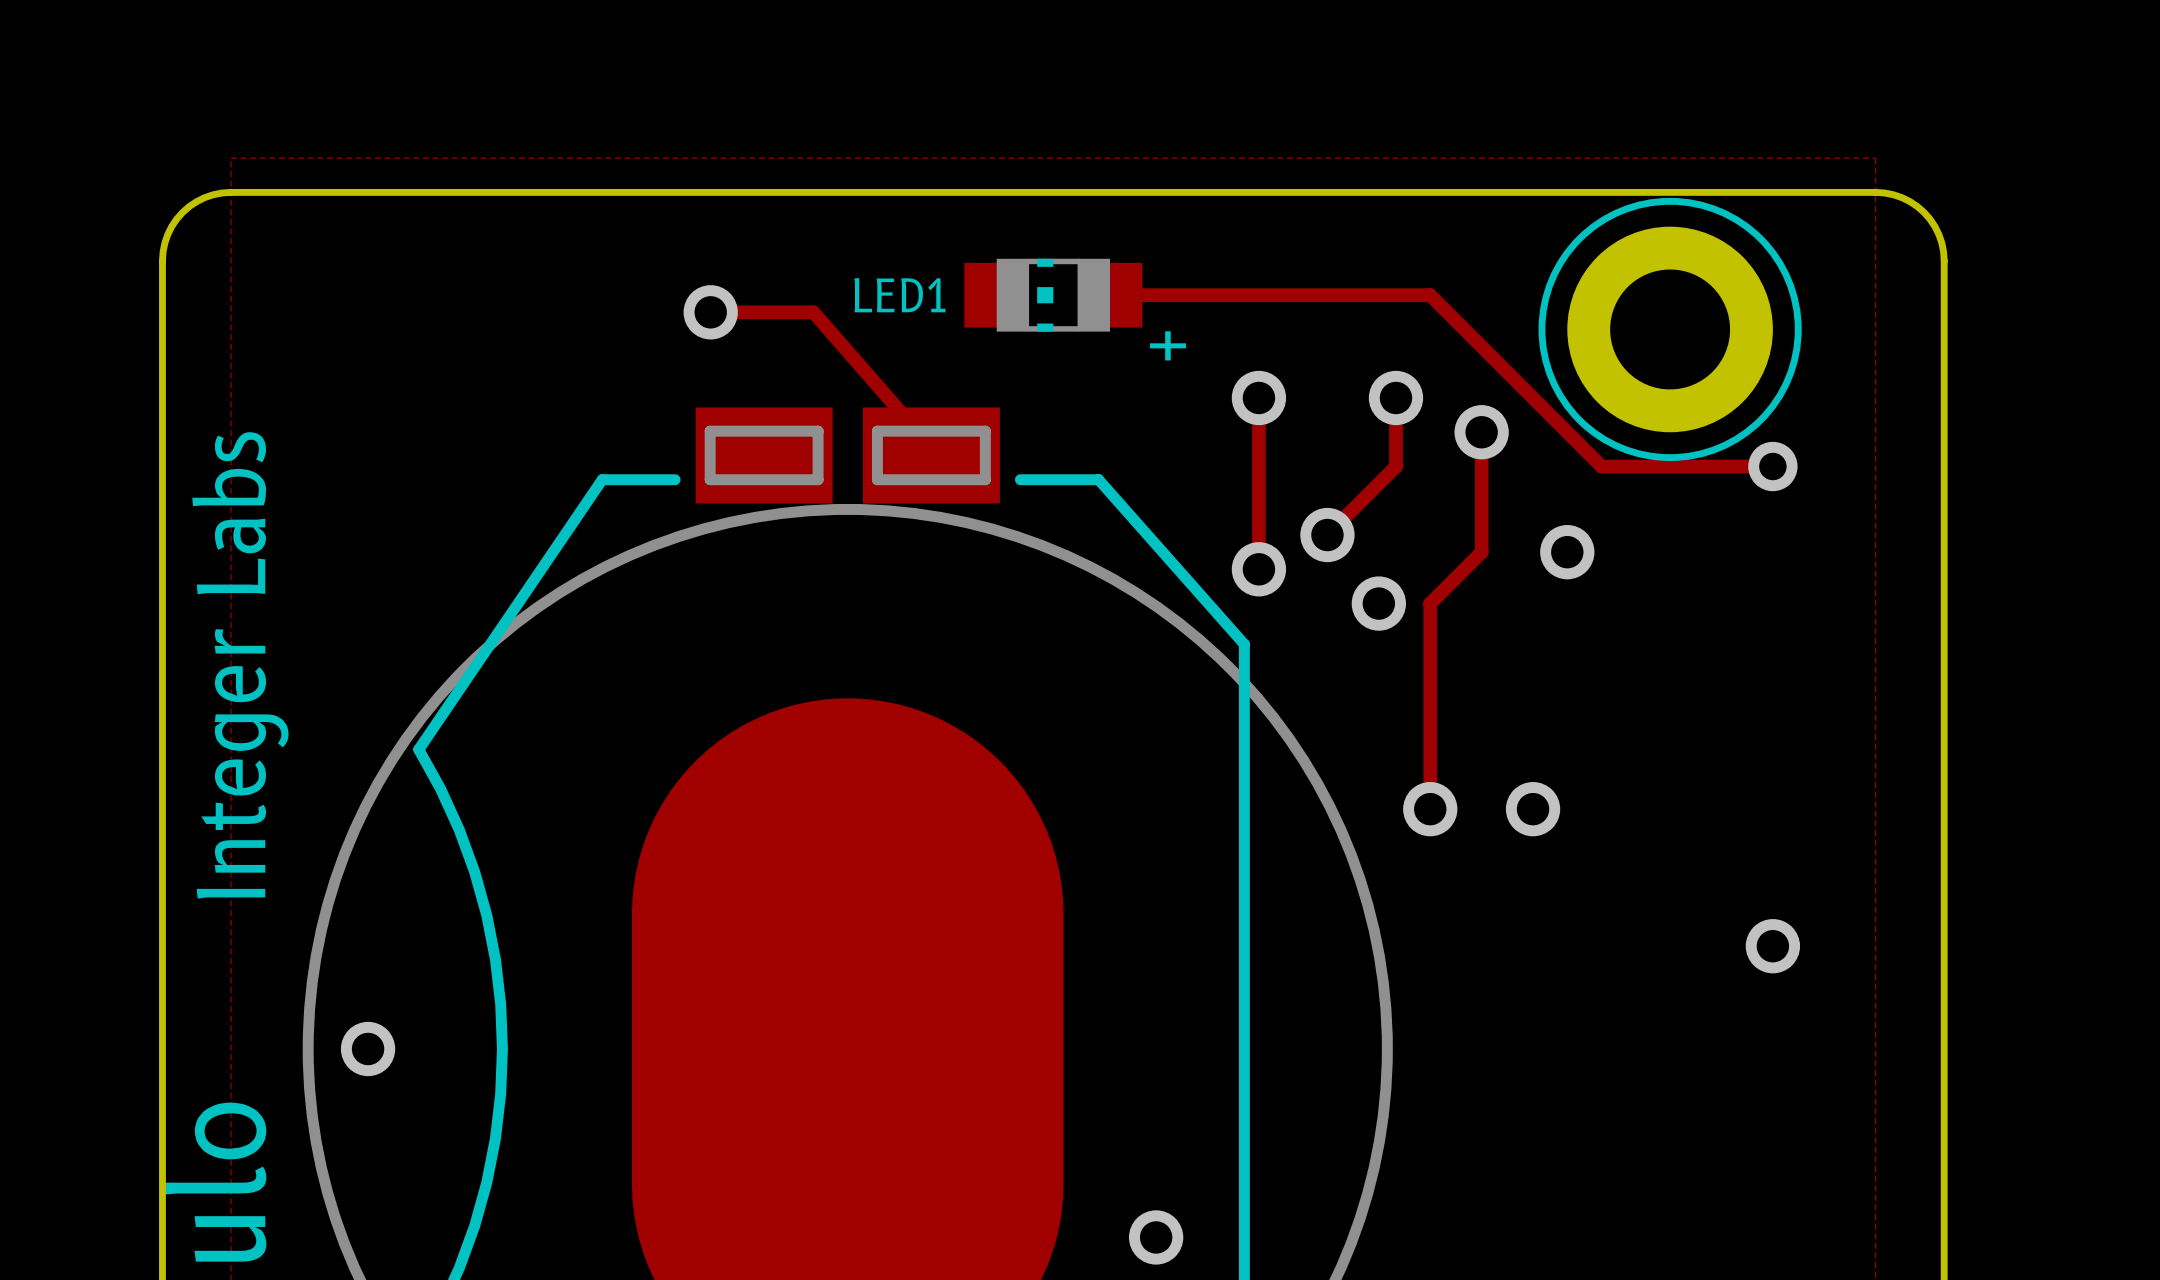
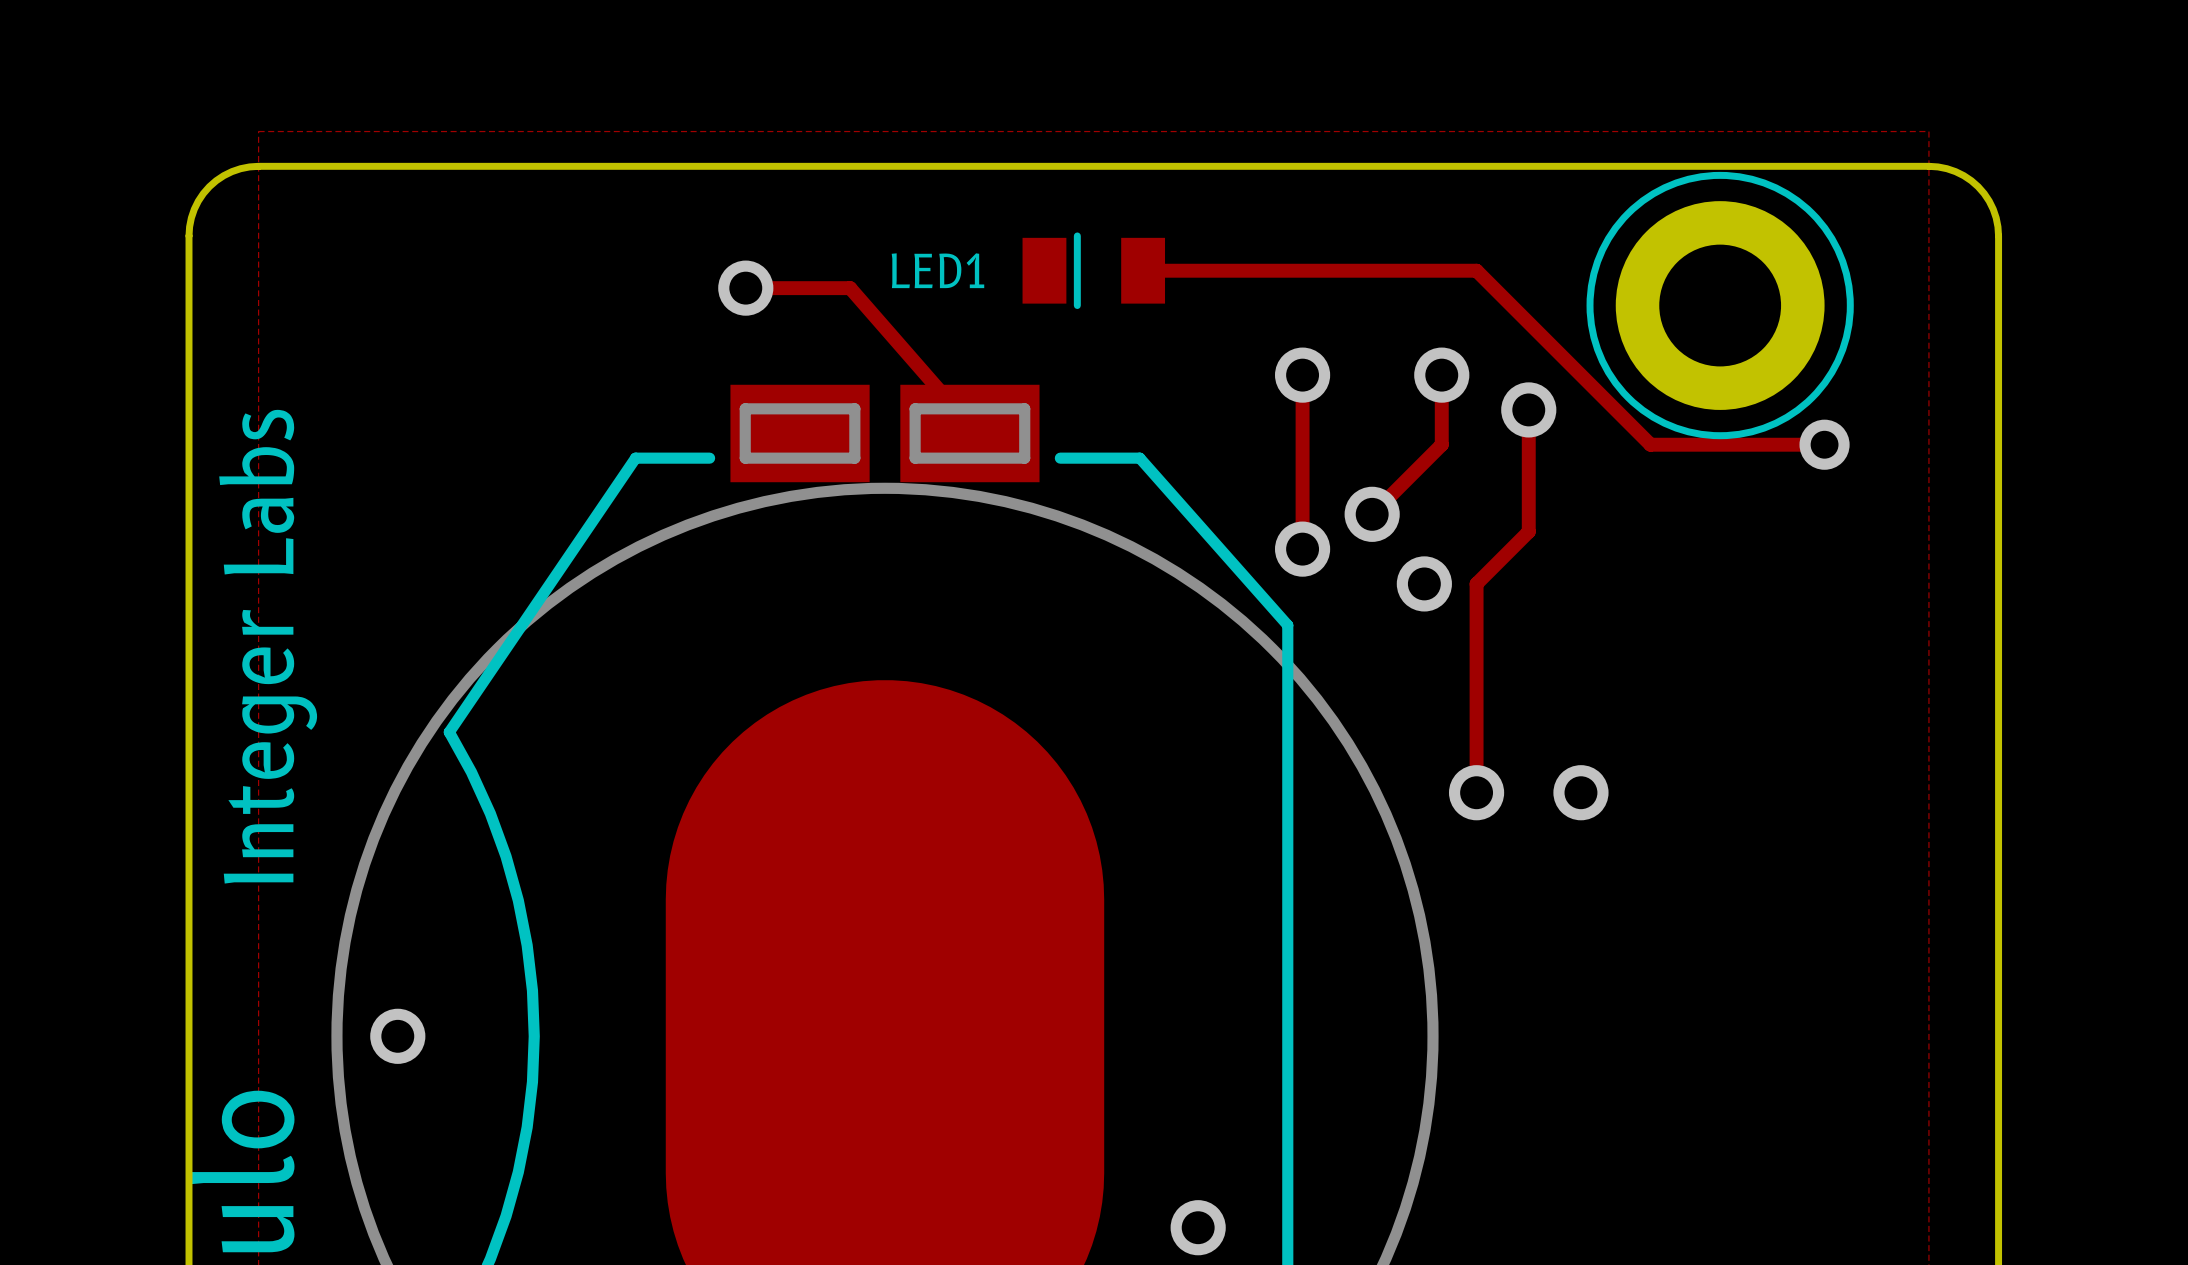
LED1 footprint: [964, 258, 1143, 332] -> [1022, 232, 1166, 310]
via: (1567, 552) -> none
via: (1772, 946) -> none

